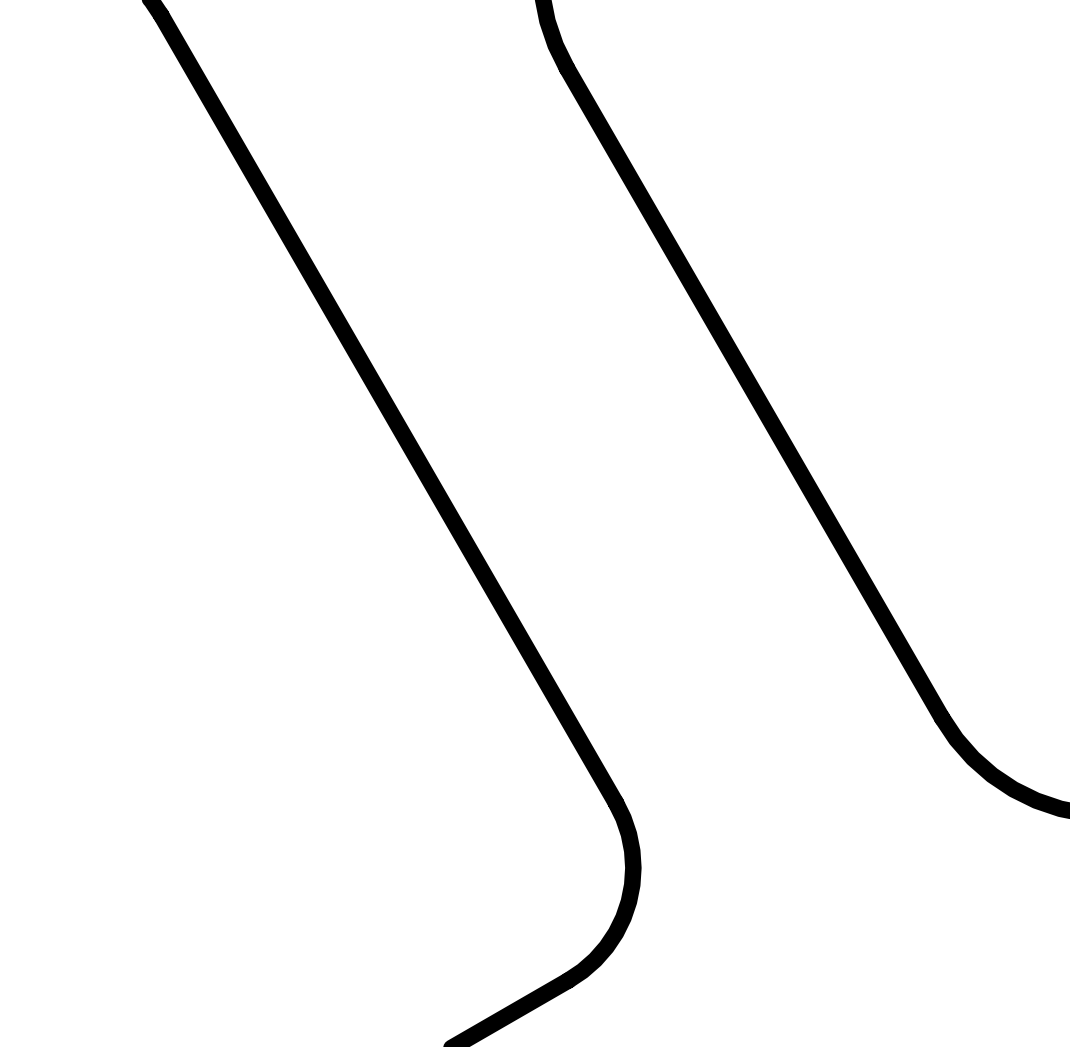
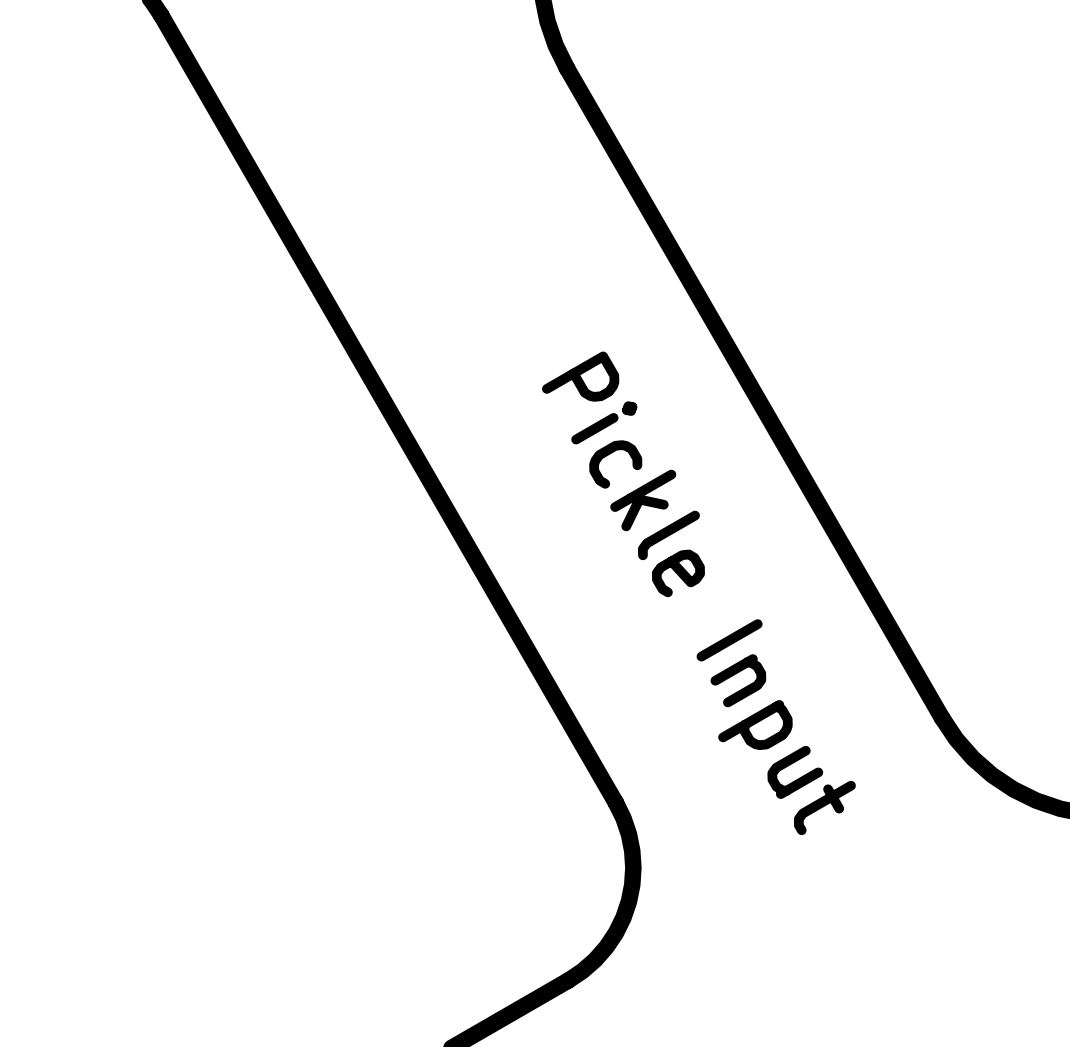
text: none -> Pickle Input (698, 593)

